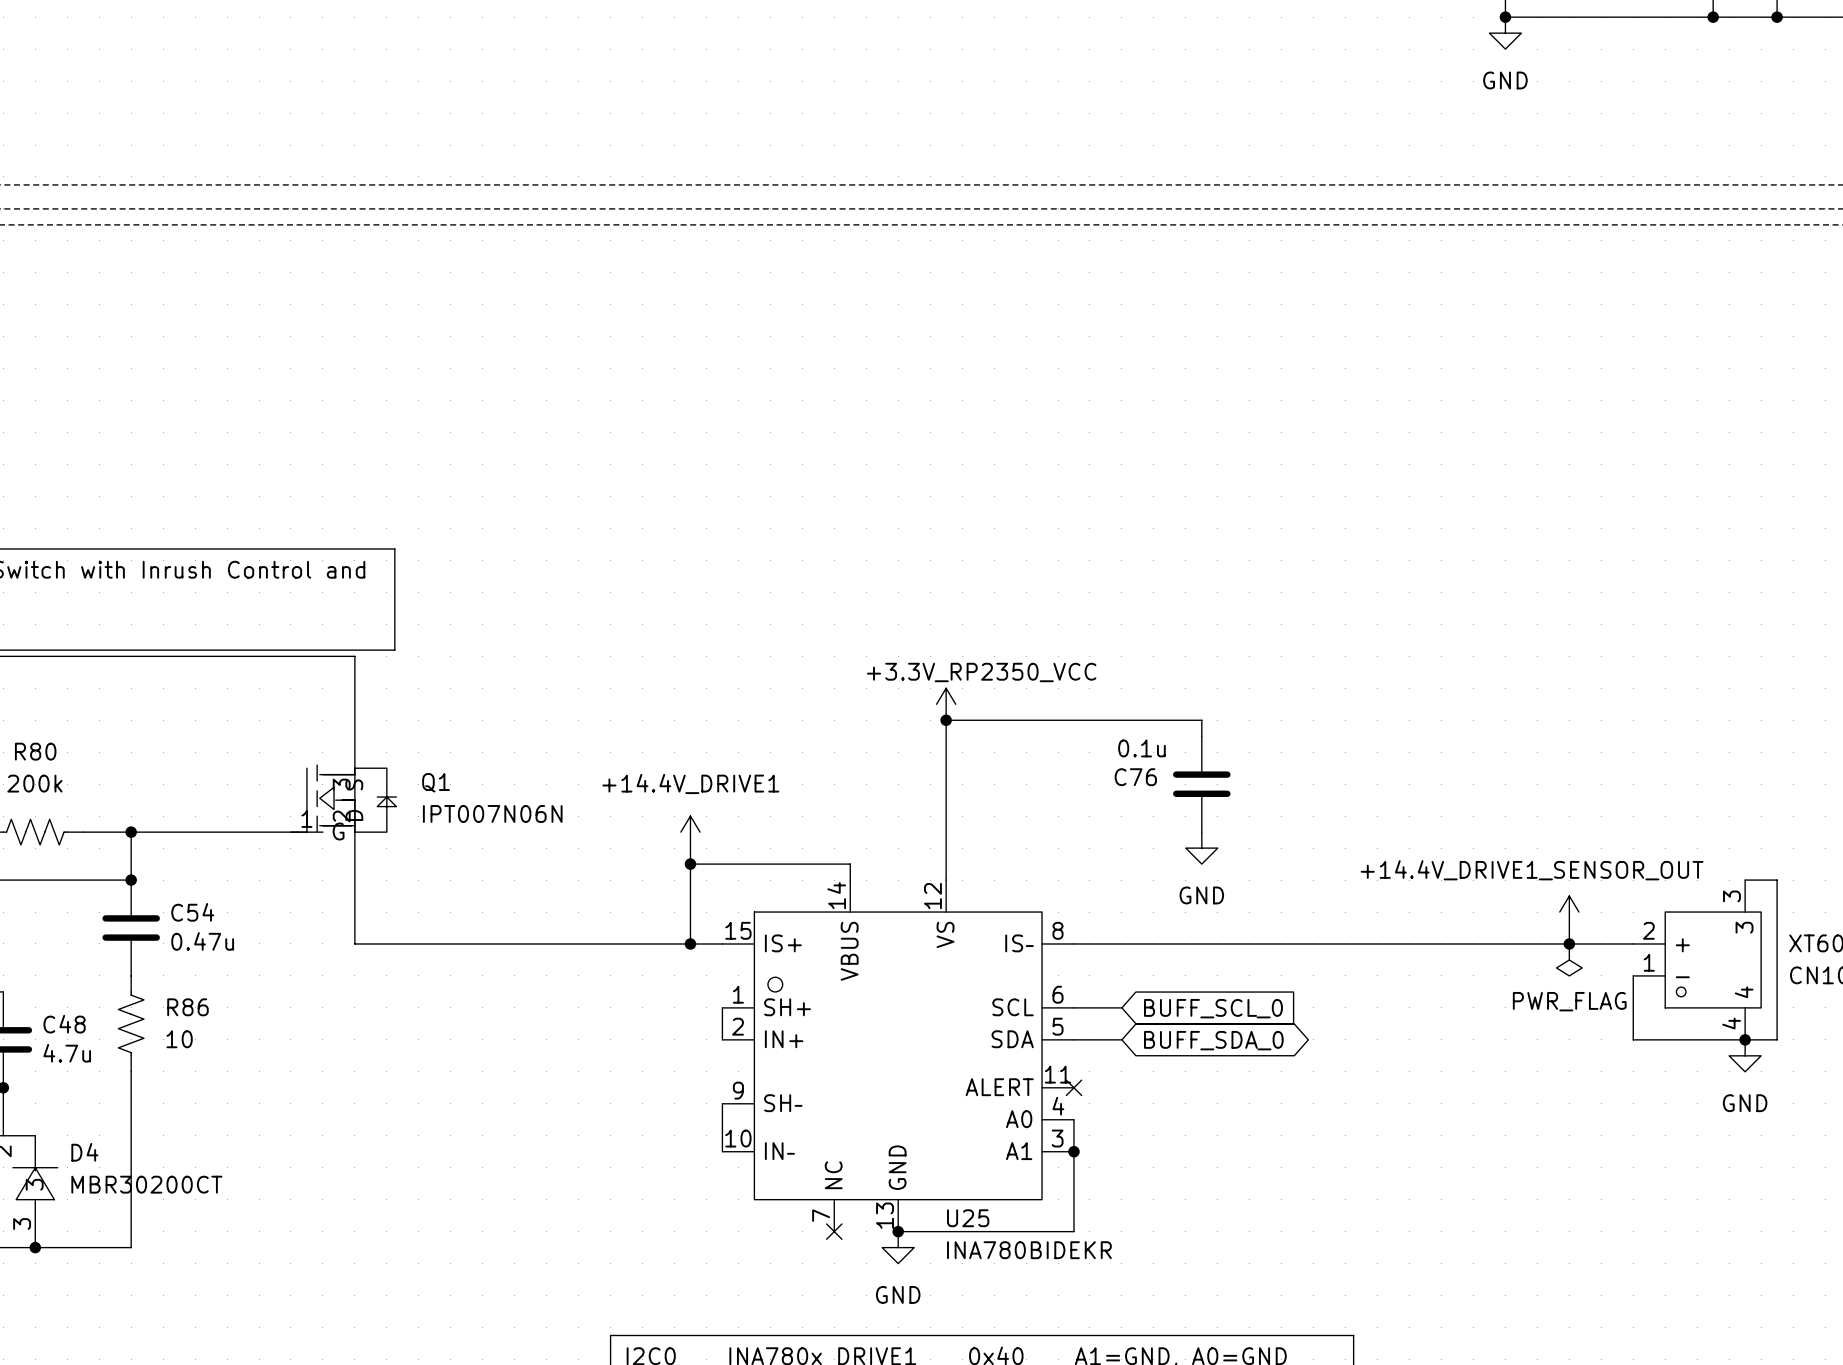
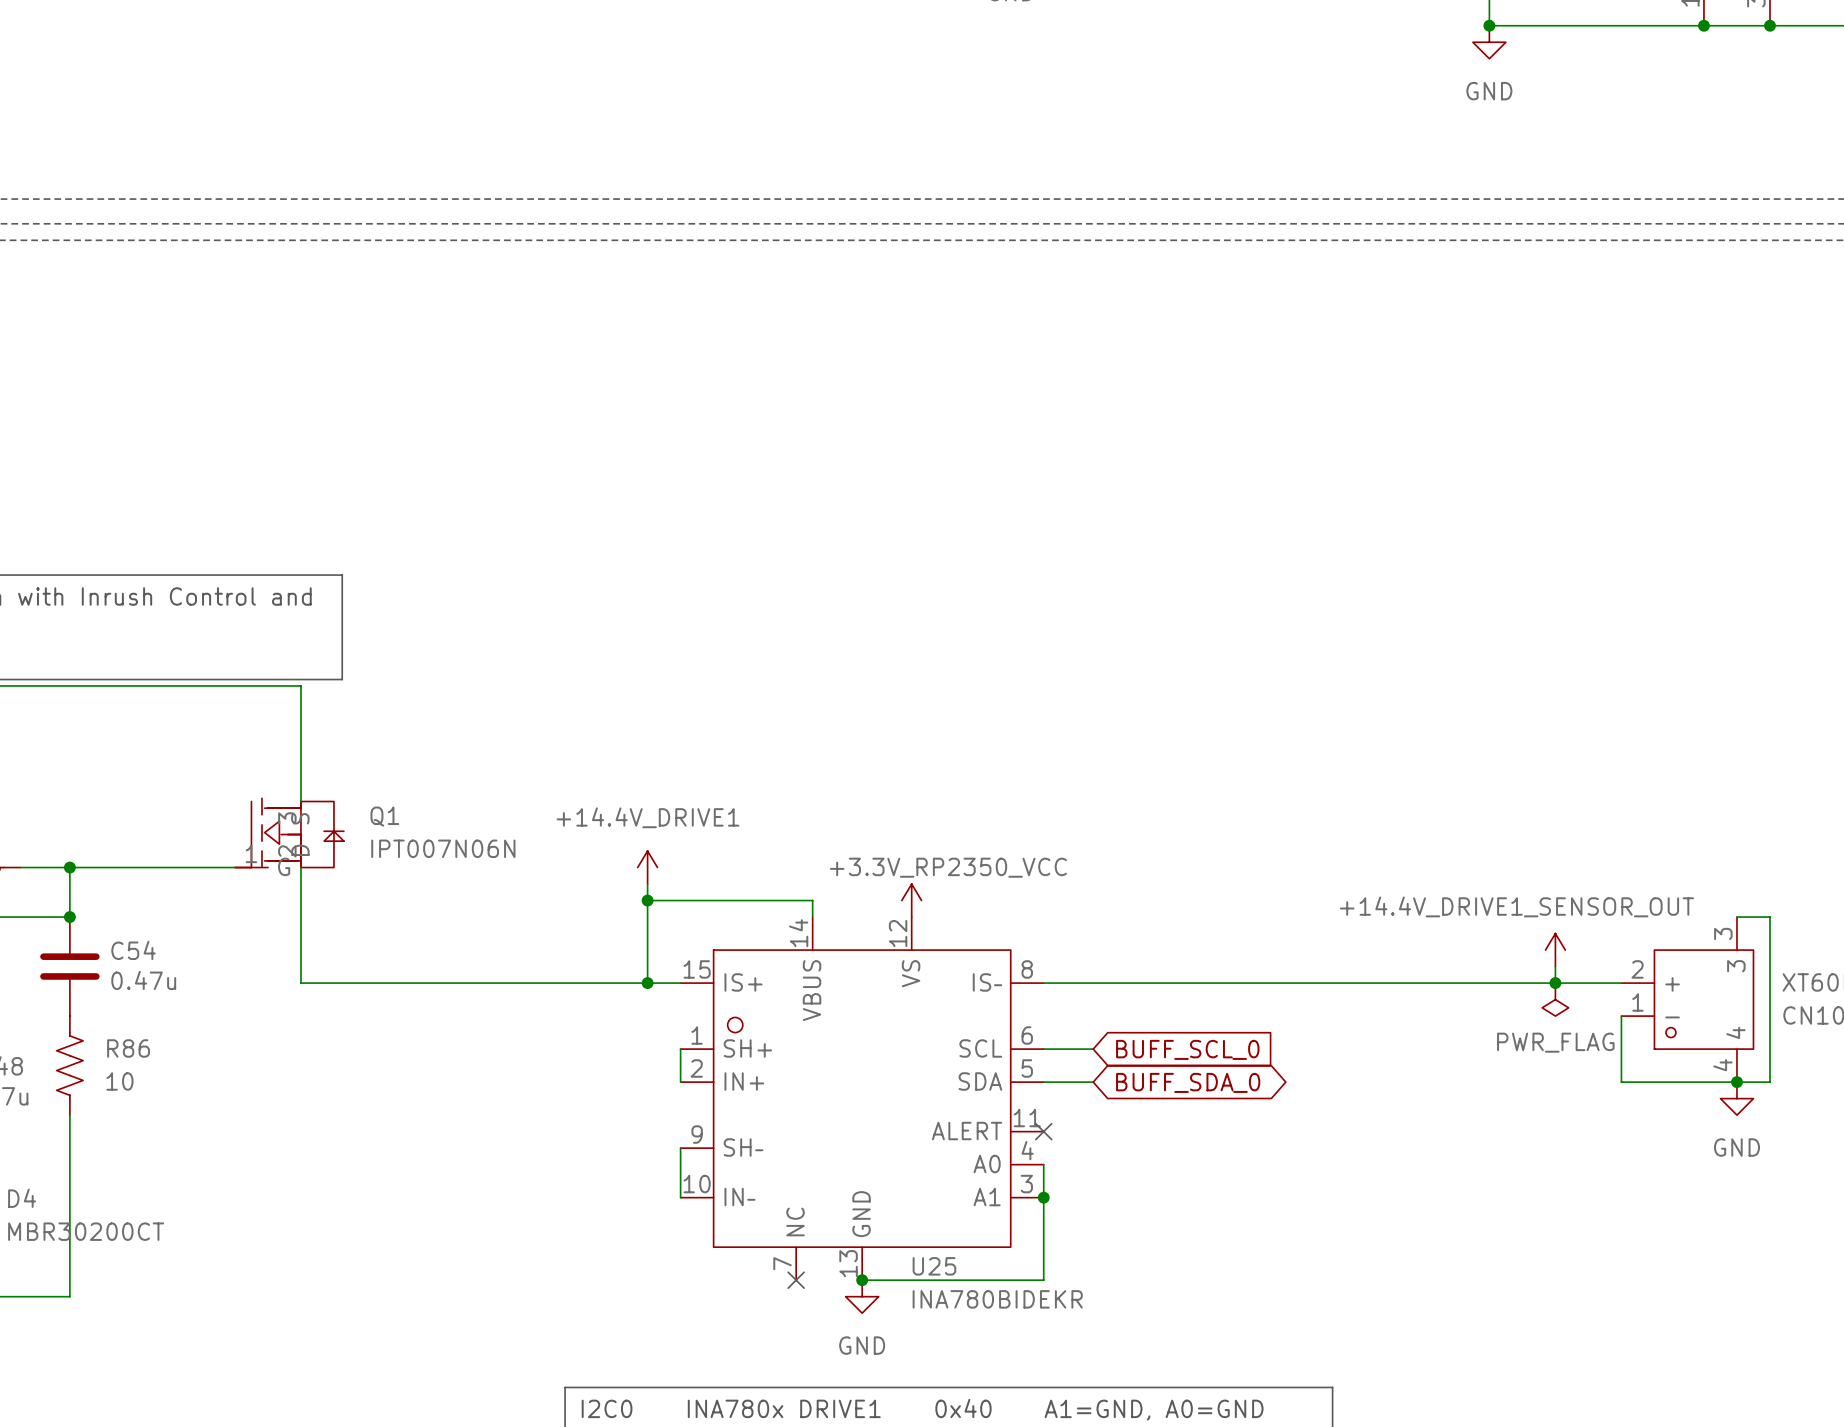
power symbol position: +3.3V_RP2350_VCC (946, 704) -> +3.3V_RP2350_VCC (911, 900)
junction: (946, 720) -> none
wire: (1201, 736) (1201, 720) (946, 720) (946, 880) -> none
C76: 0.1u (1201, 784) -> none
power symbol: GND (1201, 848) -> none

